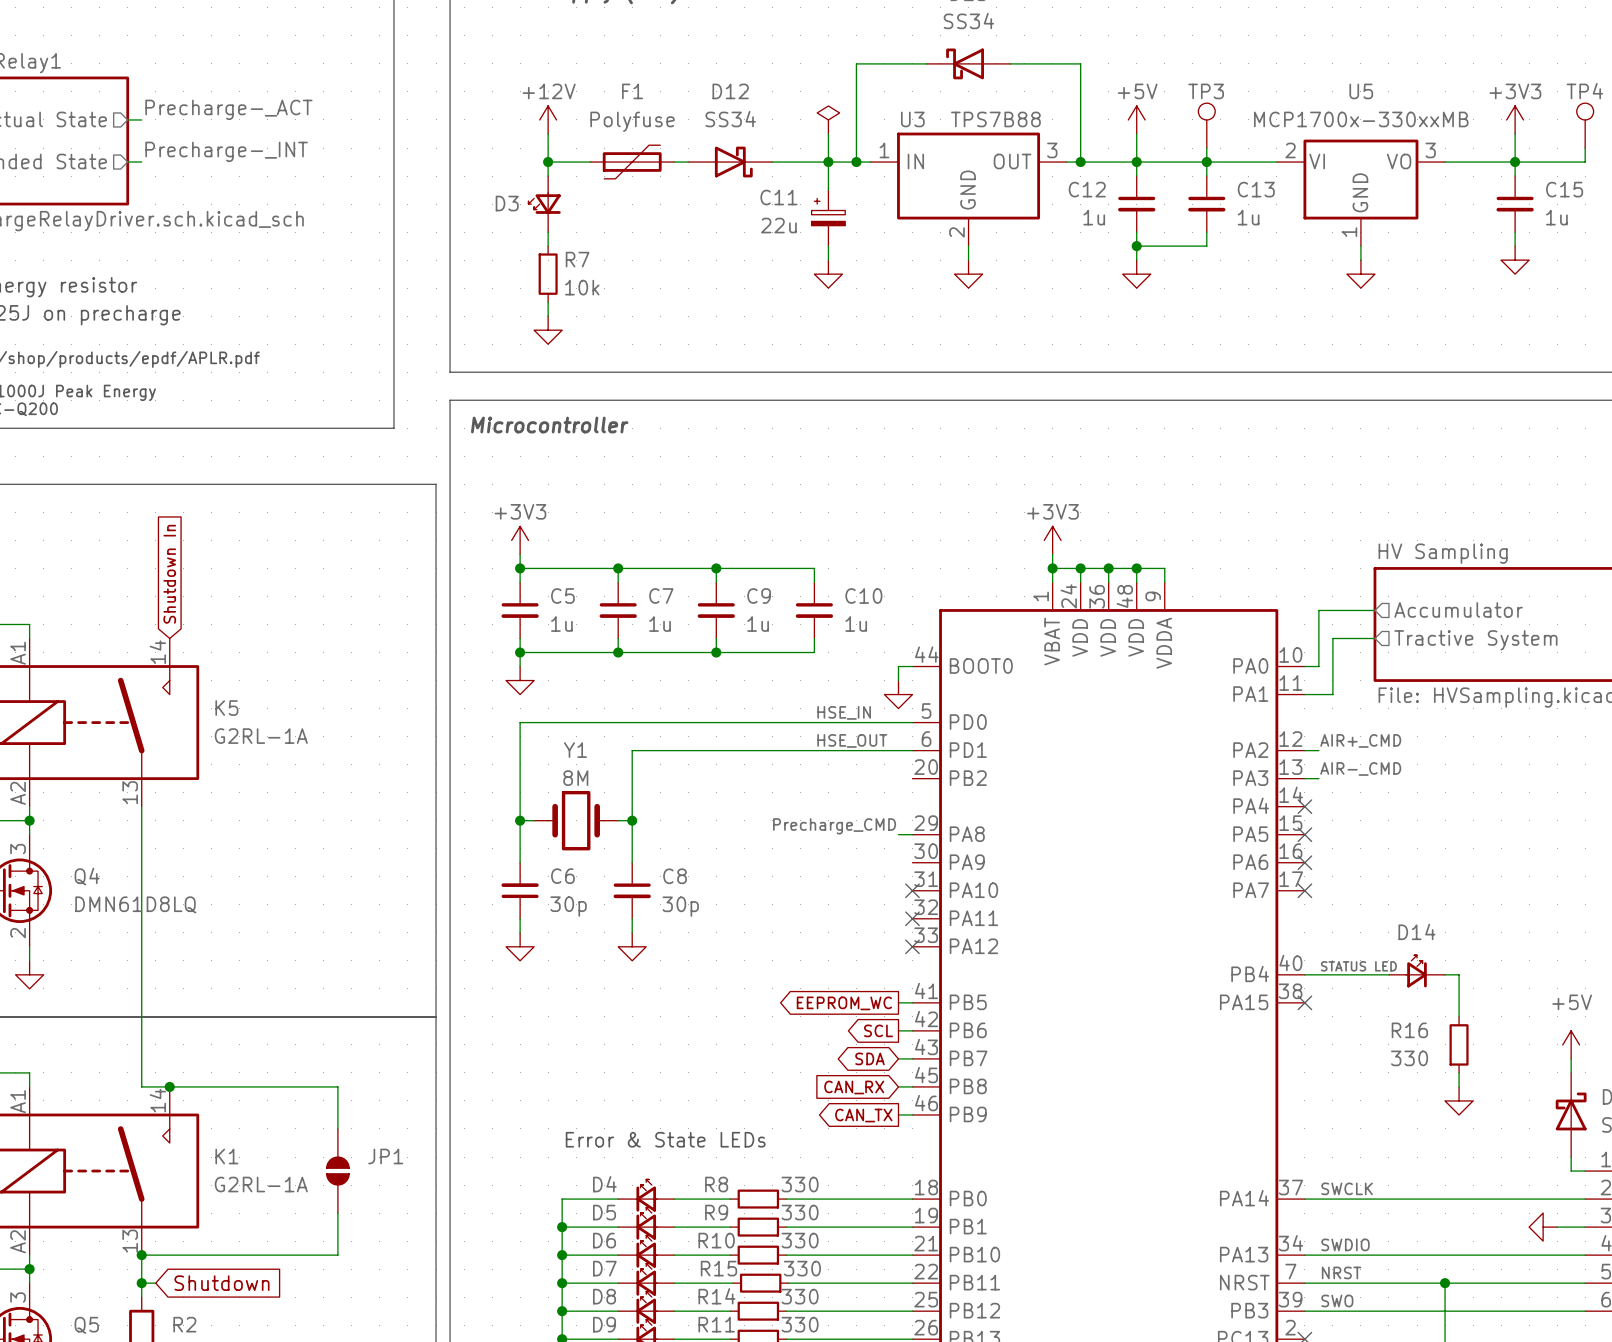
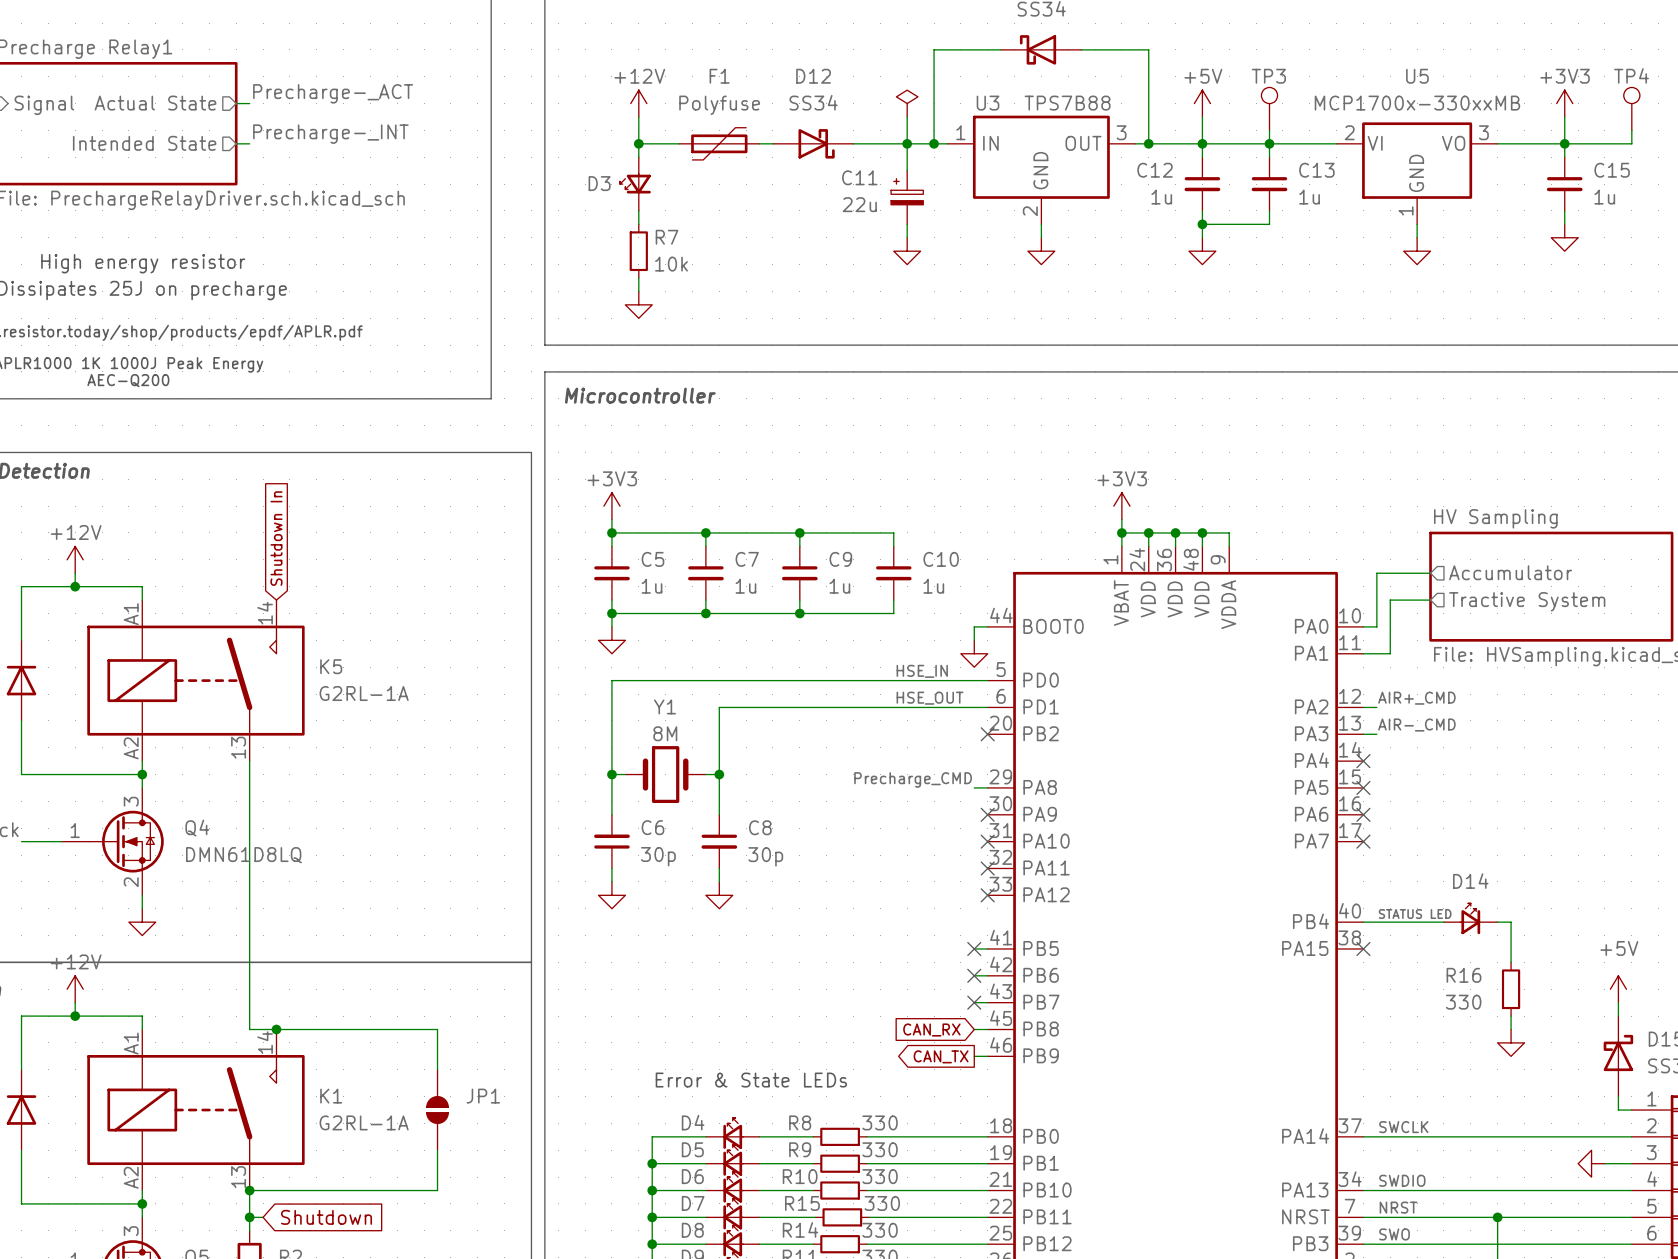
no-connect mark: none -> (987, 734)
no-connect mark: none -> (987, 814)
no-connect mark: none -> (974, 948)
global label: EEPROM_WC (844, 1003) -> none
global label: SCL (878, 1030) -> none
no-connect mark: none -> (974, 975)
global label: SDA (869, 1058) -> none
no-connect mark: none -> (974, 1002)

